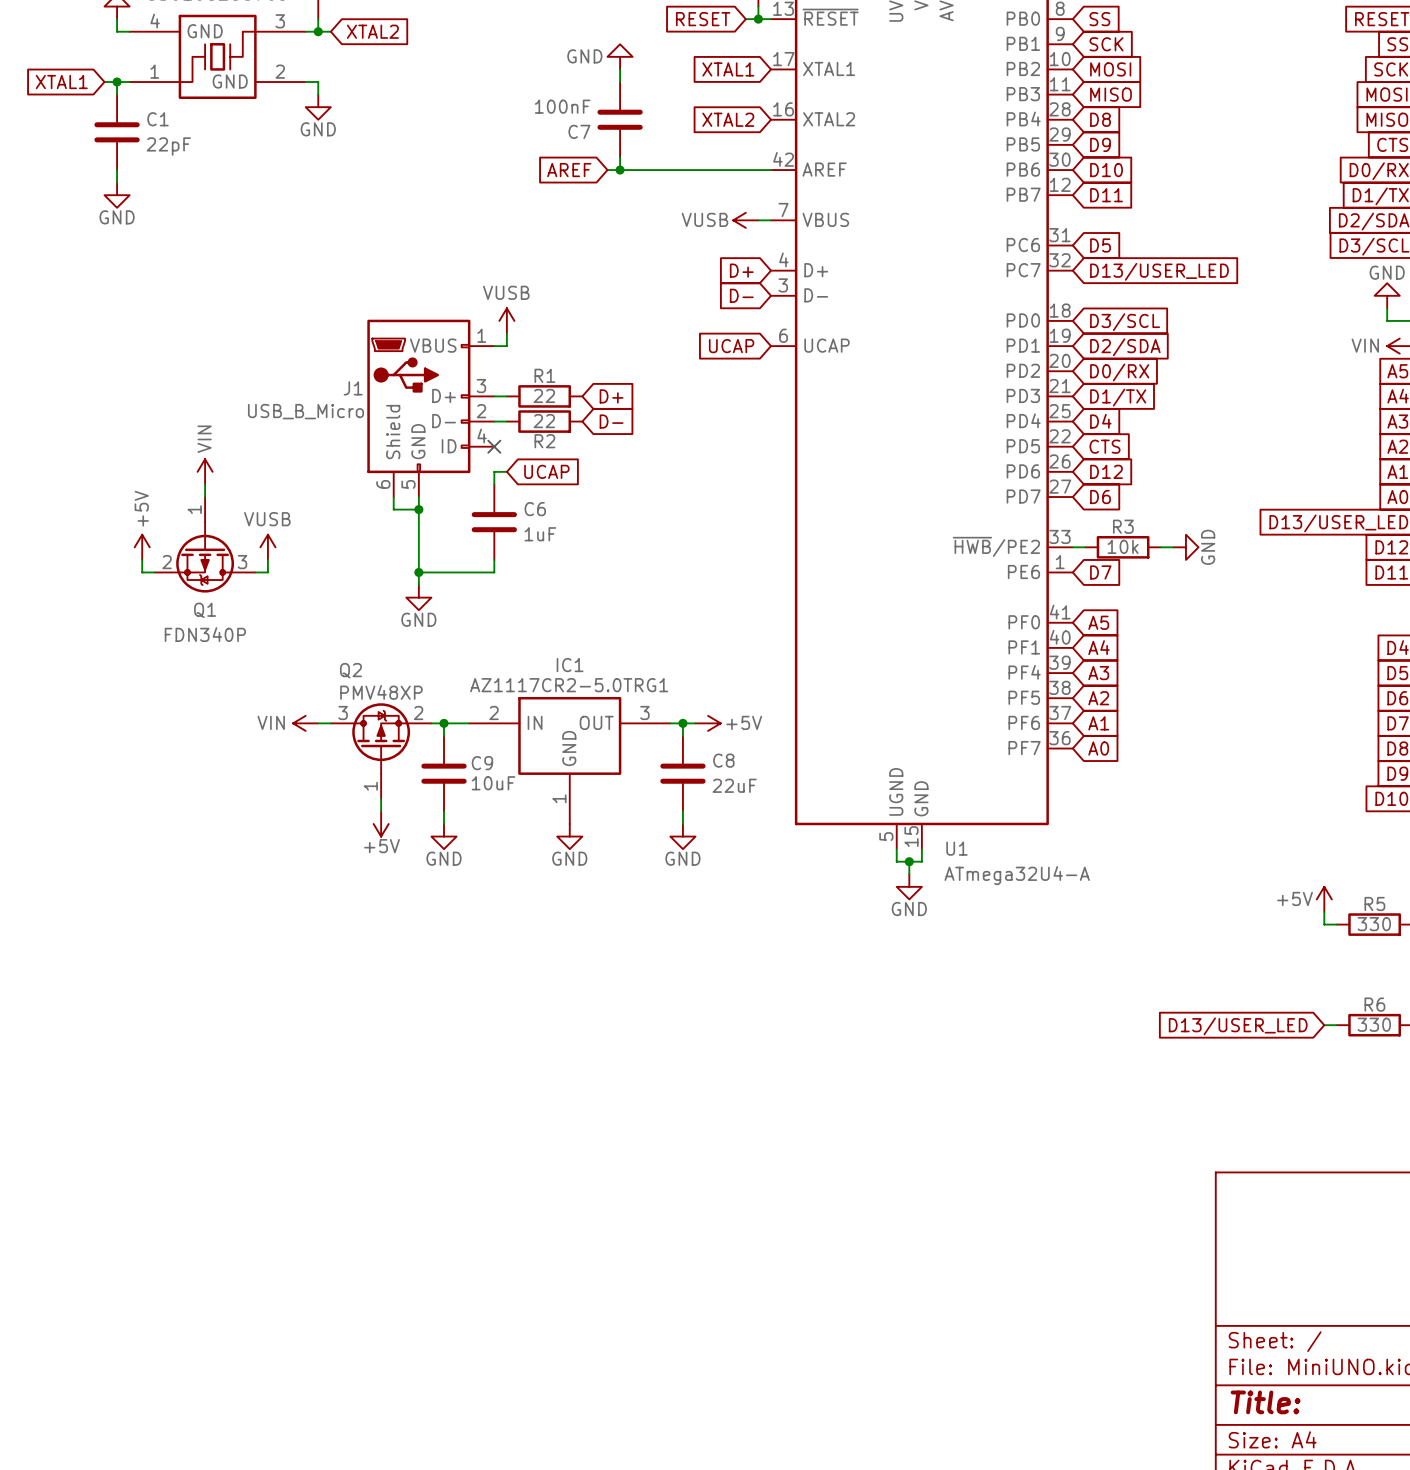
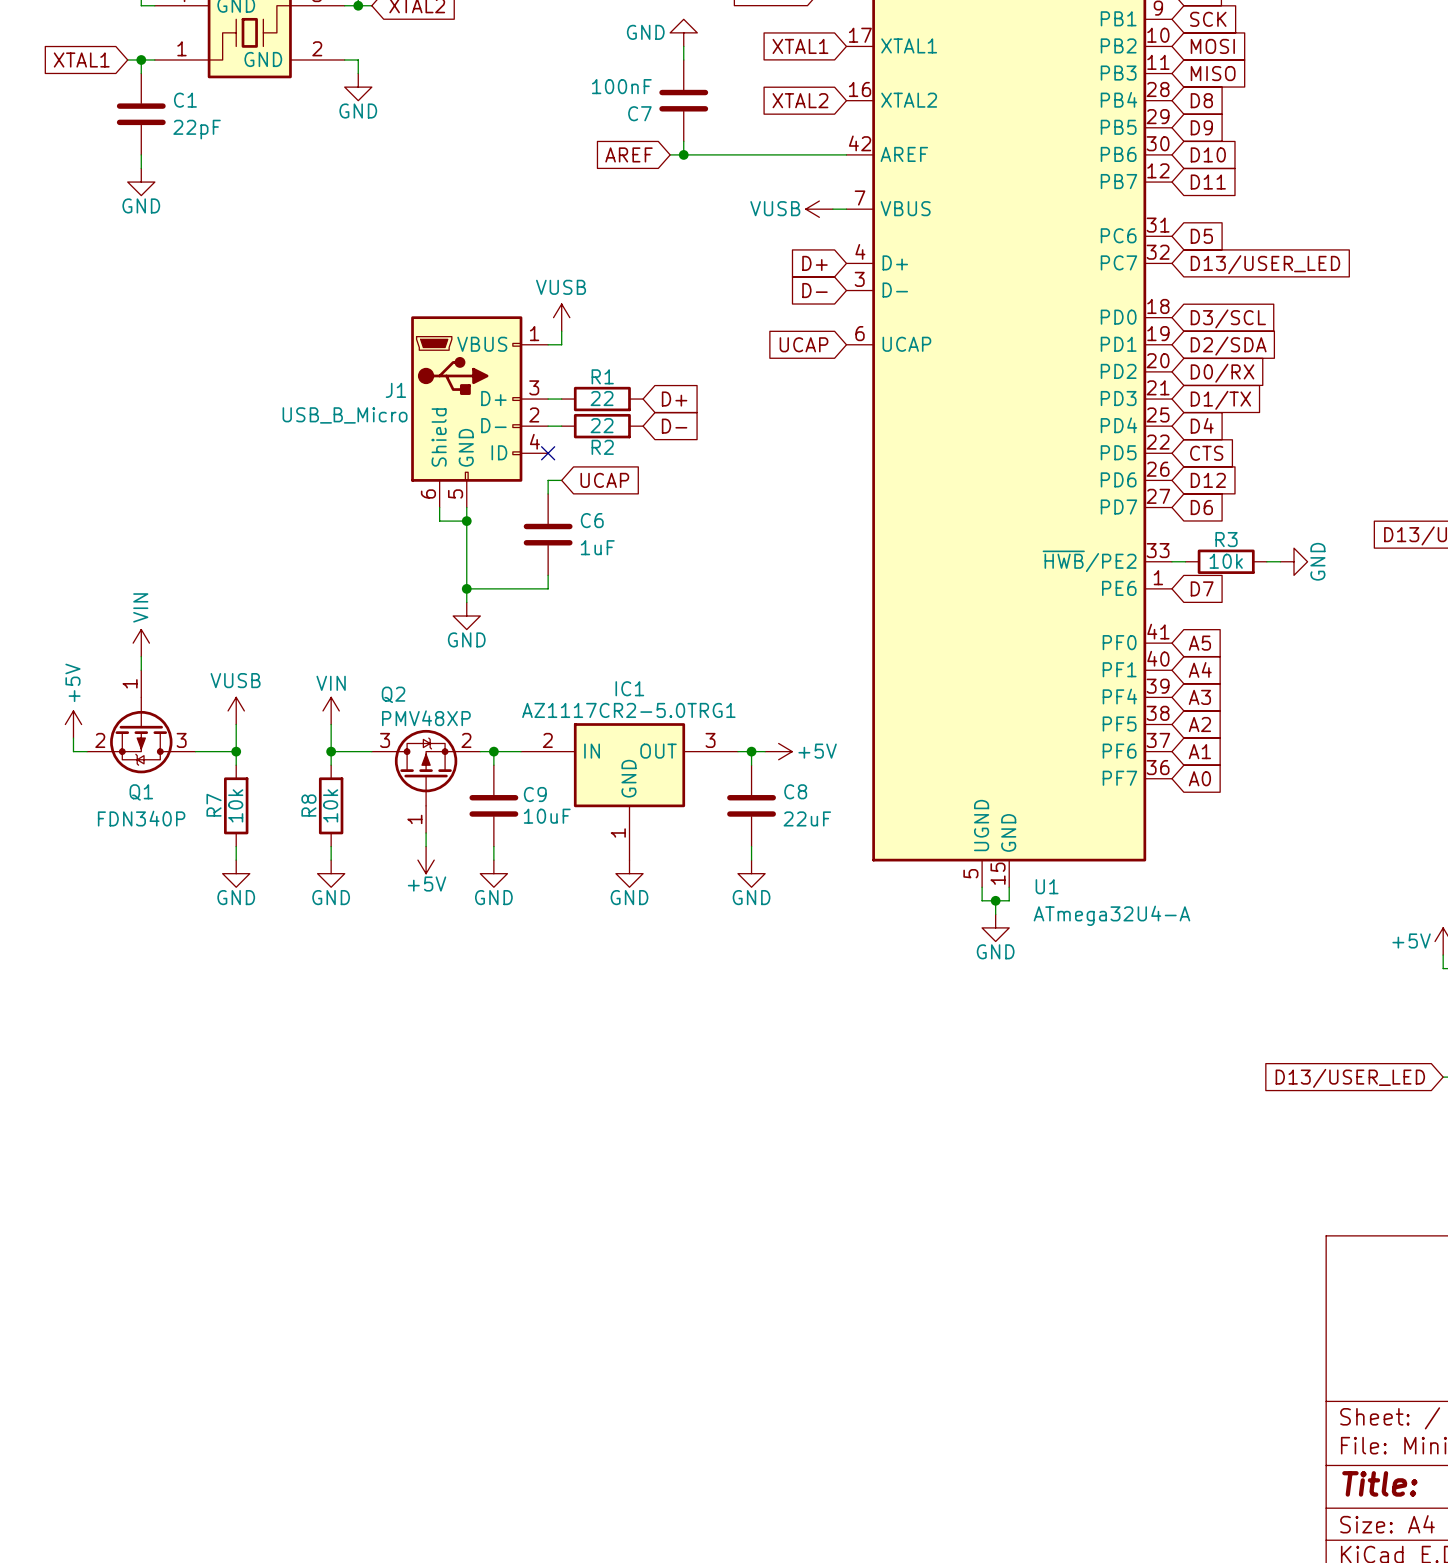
power symbol: VIN (205, 471) -> none
wire: (205, 484) (205, 497) -> (141, 656) (141, 670)
Q1 position: (205, 544) -> (141, 721)
power symbol position: +5V (142, 547) -> +5V (73, 724)
power symbol position: VUSB (267, 547) -> VUSB (236, 710)
wire: (142, 559) (142, 572) (154, 572) -> (73, 738) (73, 751) (87, 751)
wire: (267, 559) (267, 572) (255, 572) -> none
power symbol: none -> VIN (141, 643)
wire: none -> (236, 724) (236, 765)
wire: none -> (331, 724) (331, 765)
wire: none -> (195, 751) (236, 751)
junction: none -> (236, 751)
junction: none -> (331, 751)
power symbol rotation: 0° (305, 723) -> 90° clockwise (331, 710)
power symbol position: VIN (305, 723) -> VIN (331, 710)
R7: none -> 10k (236, 805)
R8: none -> 10k (331, 805)
wire: none -> (236, 846) (236, 860)
wire: none -> (331, 846) (331, 860)
power symbol: none -> GND (236, 873)
power symbol: none -> GND (331, 873)

